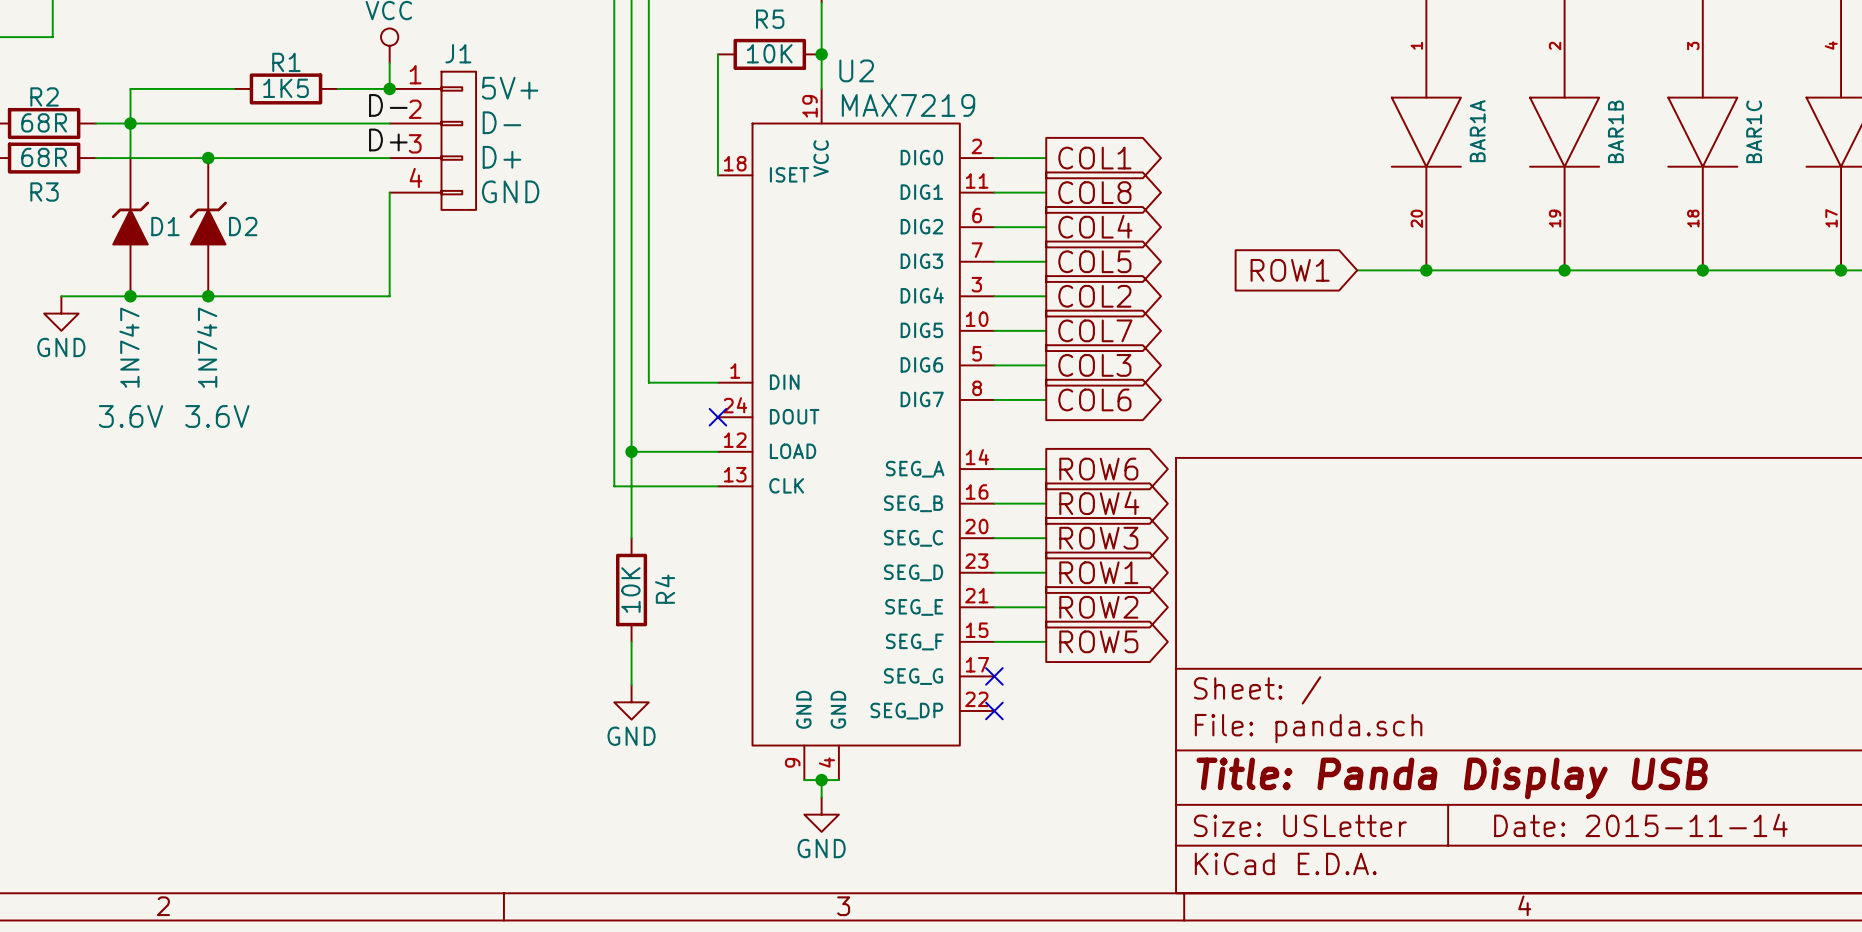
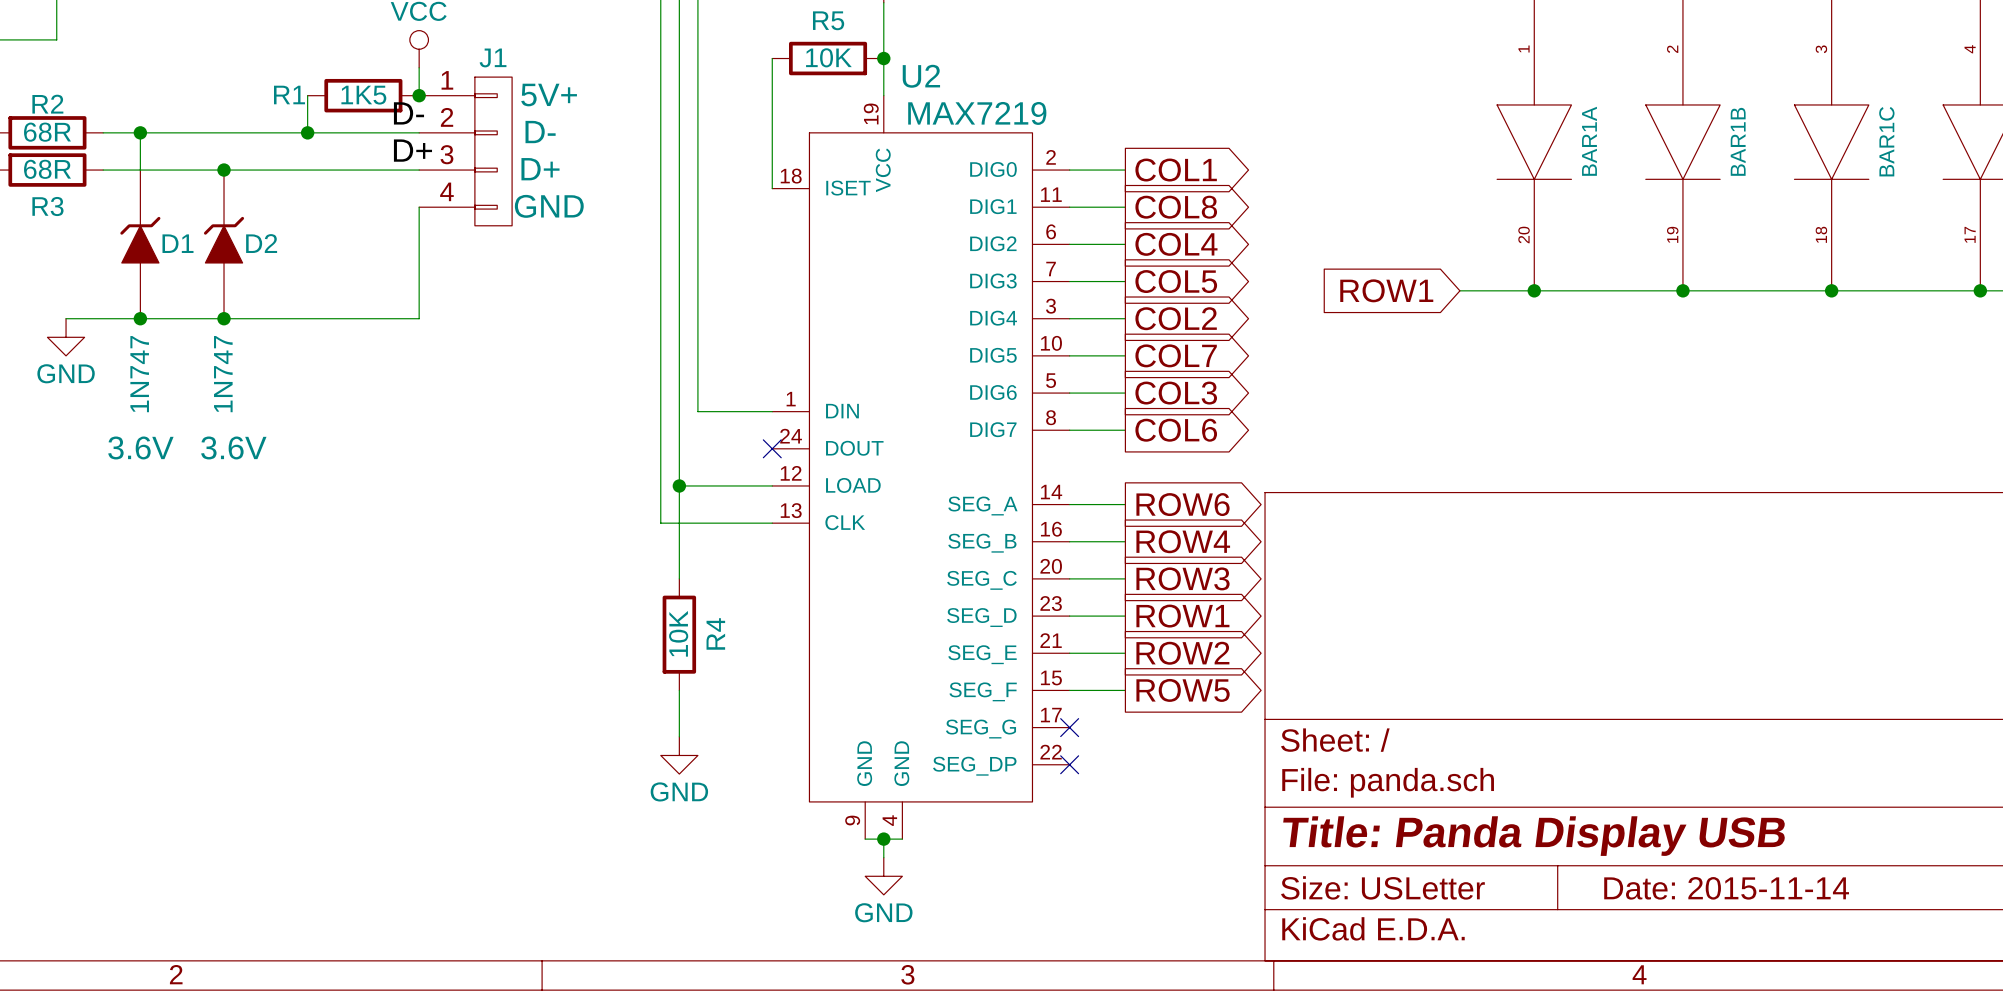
R1 name position: R1 (286, 62) -> R1 (289, 94)
wire: (234, 88) (130, 88) (130, 123) -> none
wire: none -> (307, 95) (307, 132)
R1 position: (286, 88) -> (363, 95)
wire: (337, 88) (389, 88) -> none
junction: none -> (307, 132)

